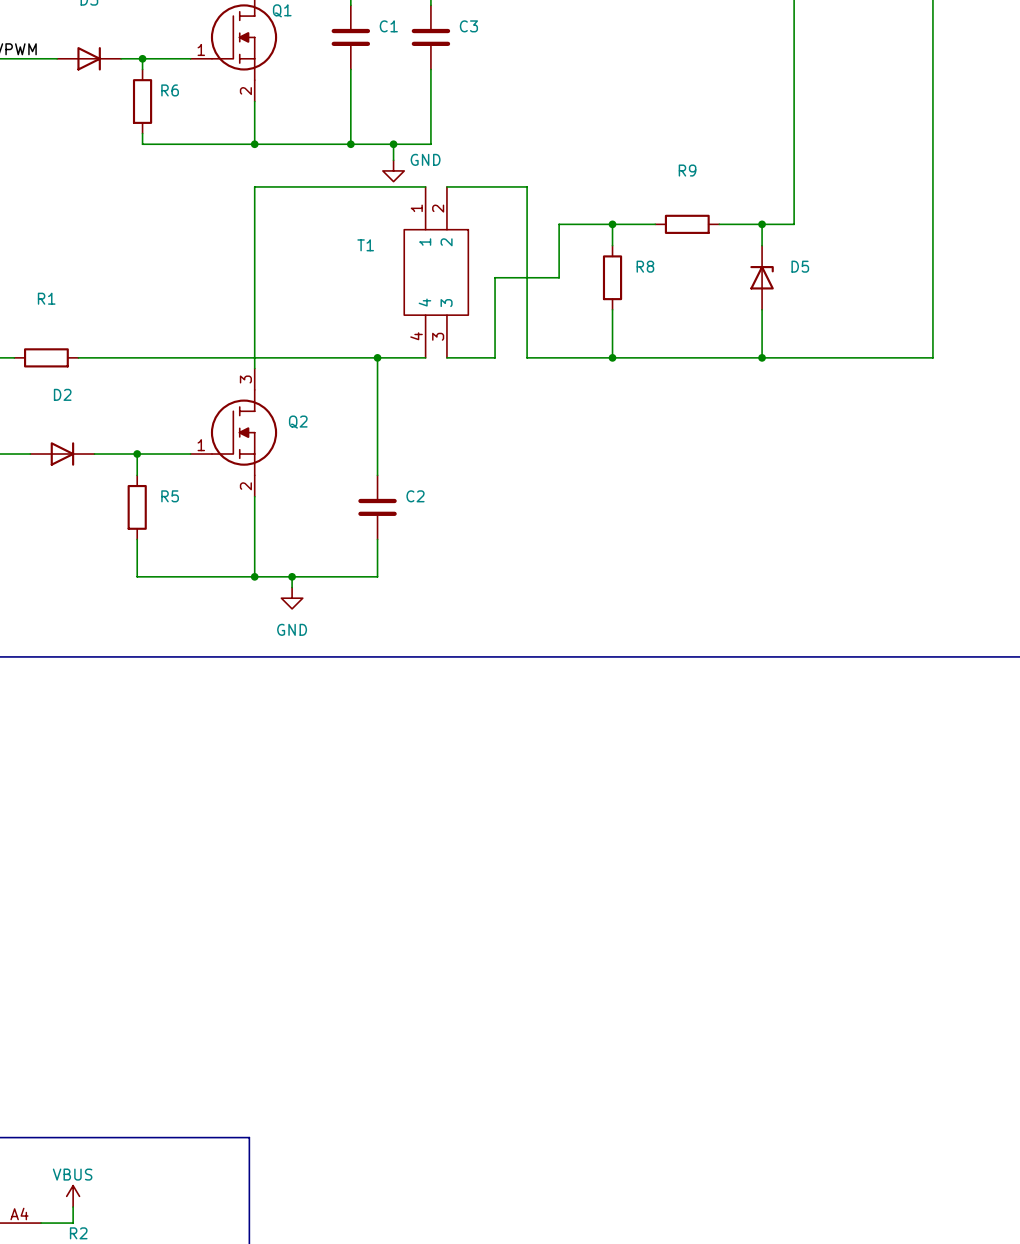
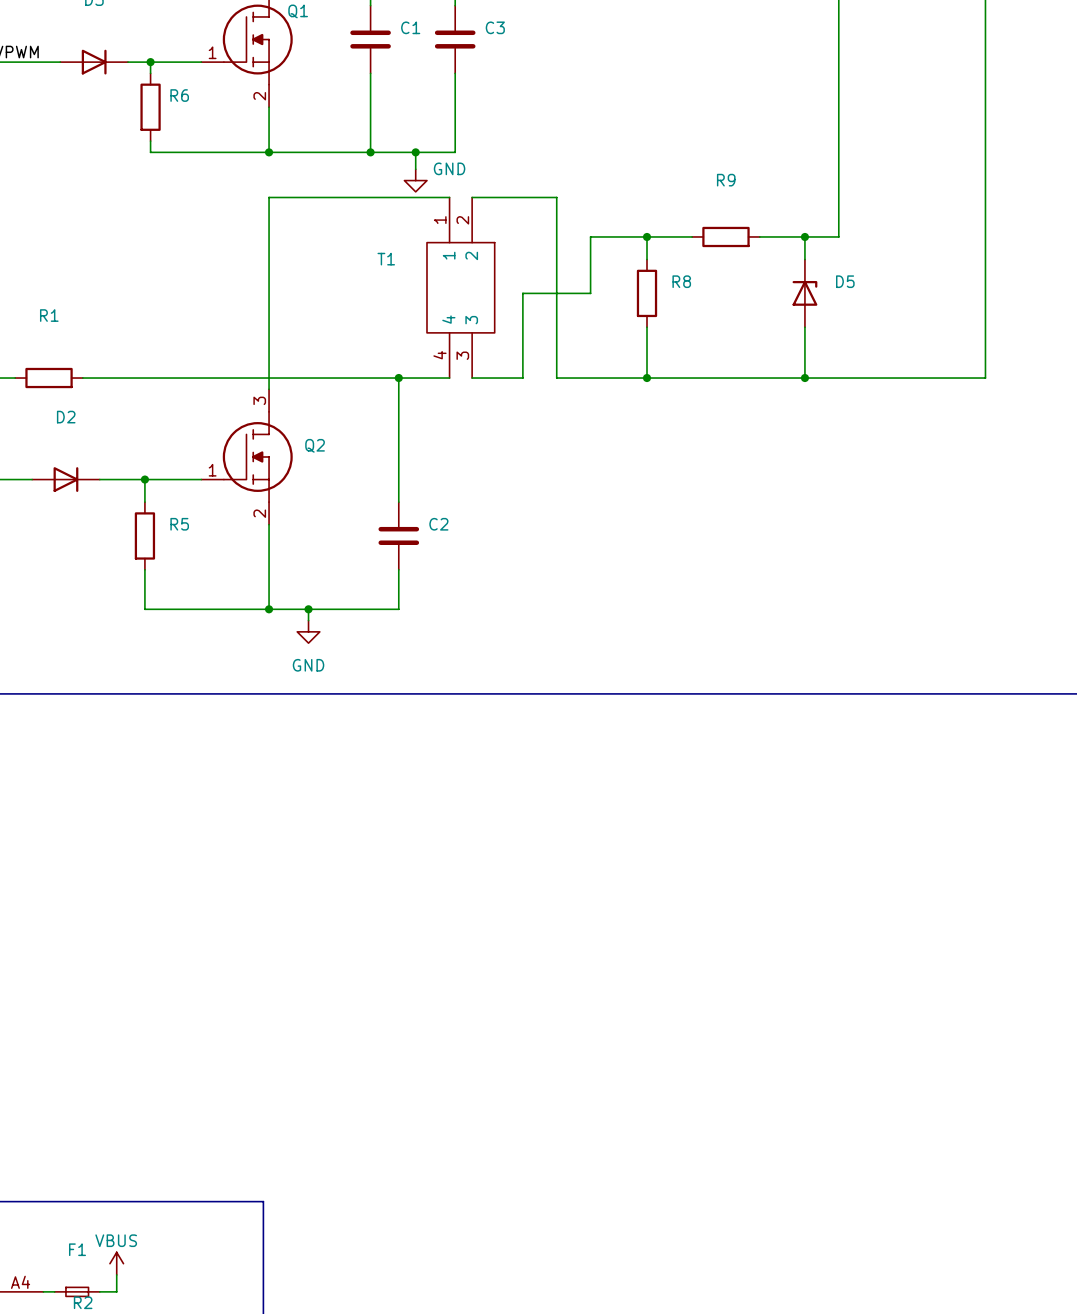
power symbol position: VBUS (73, 1196) -> VBUS (116, 1263)
wire: (73, 1207) (73, 1223) (51, 1223) -> none
wire: none -> (116, 1274) (116, 1291) (99, 1291)
F1: none -> (77, 1291)

